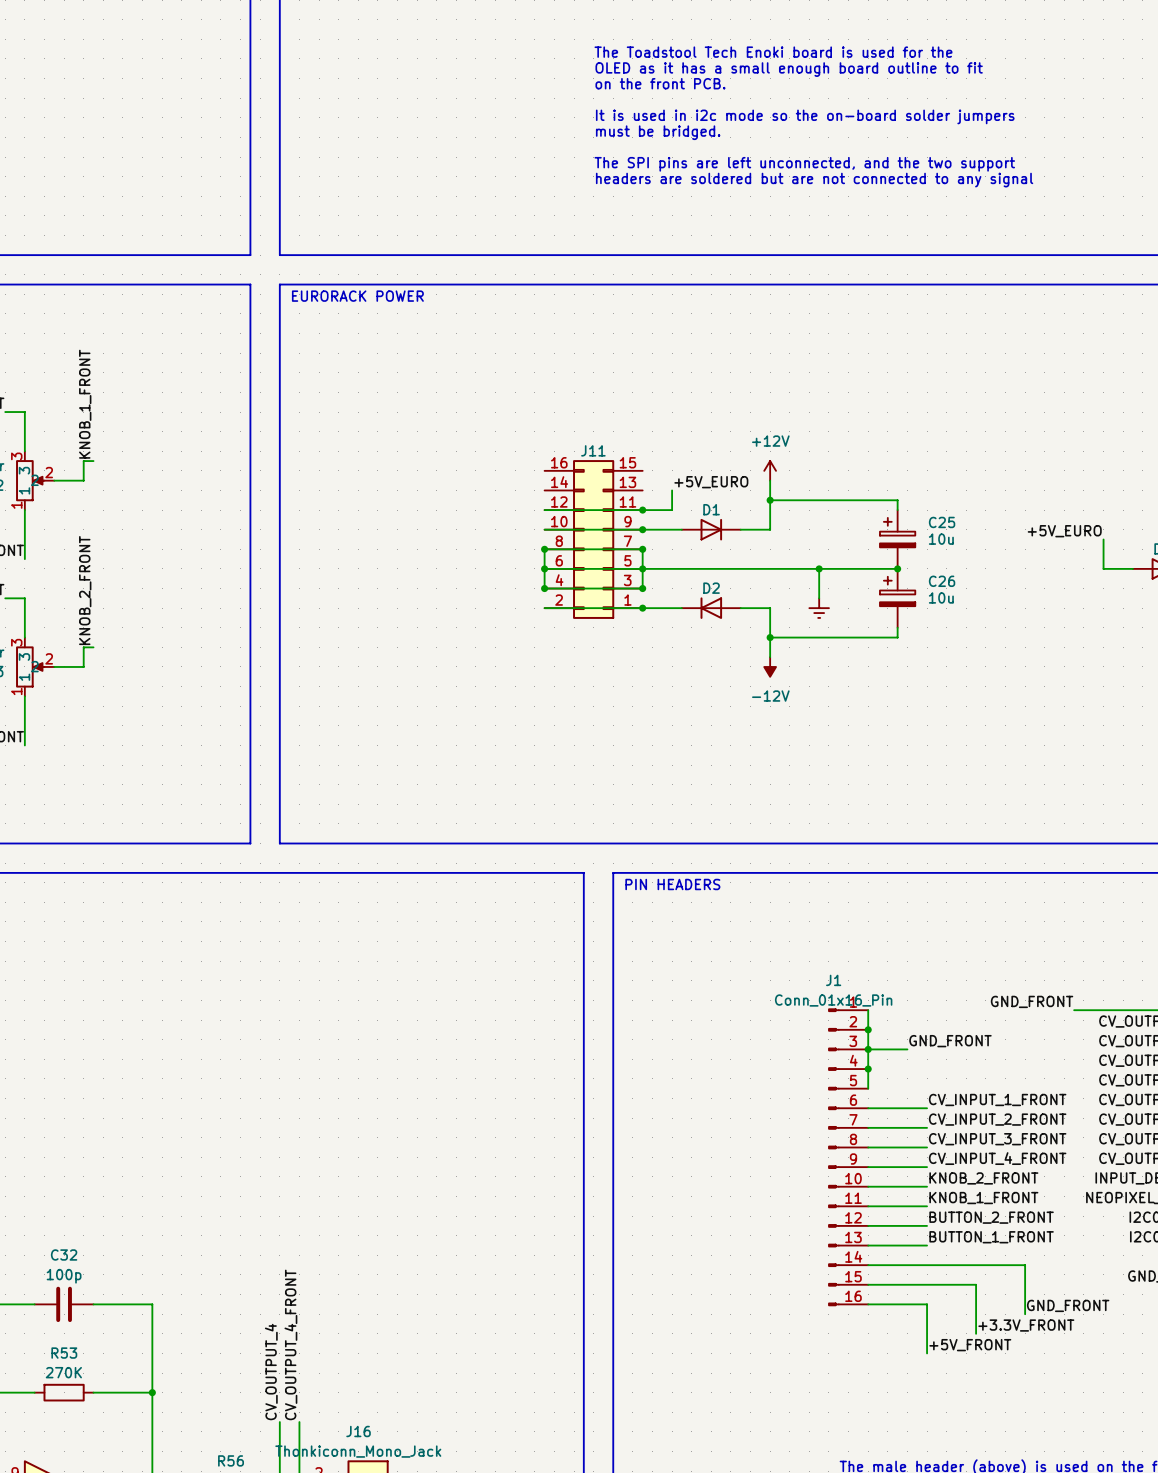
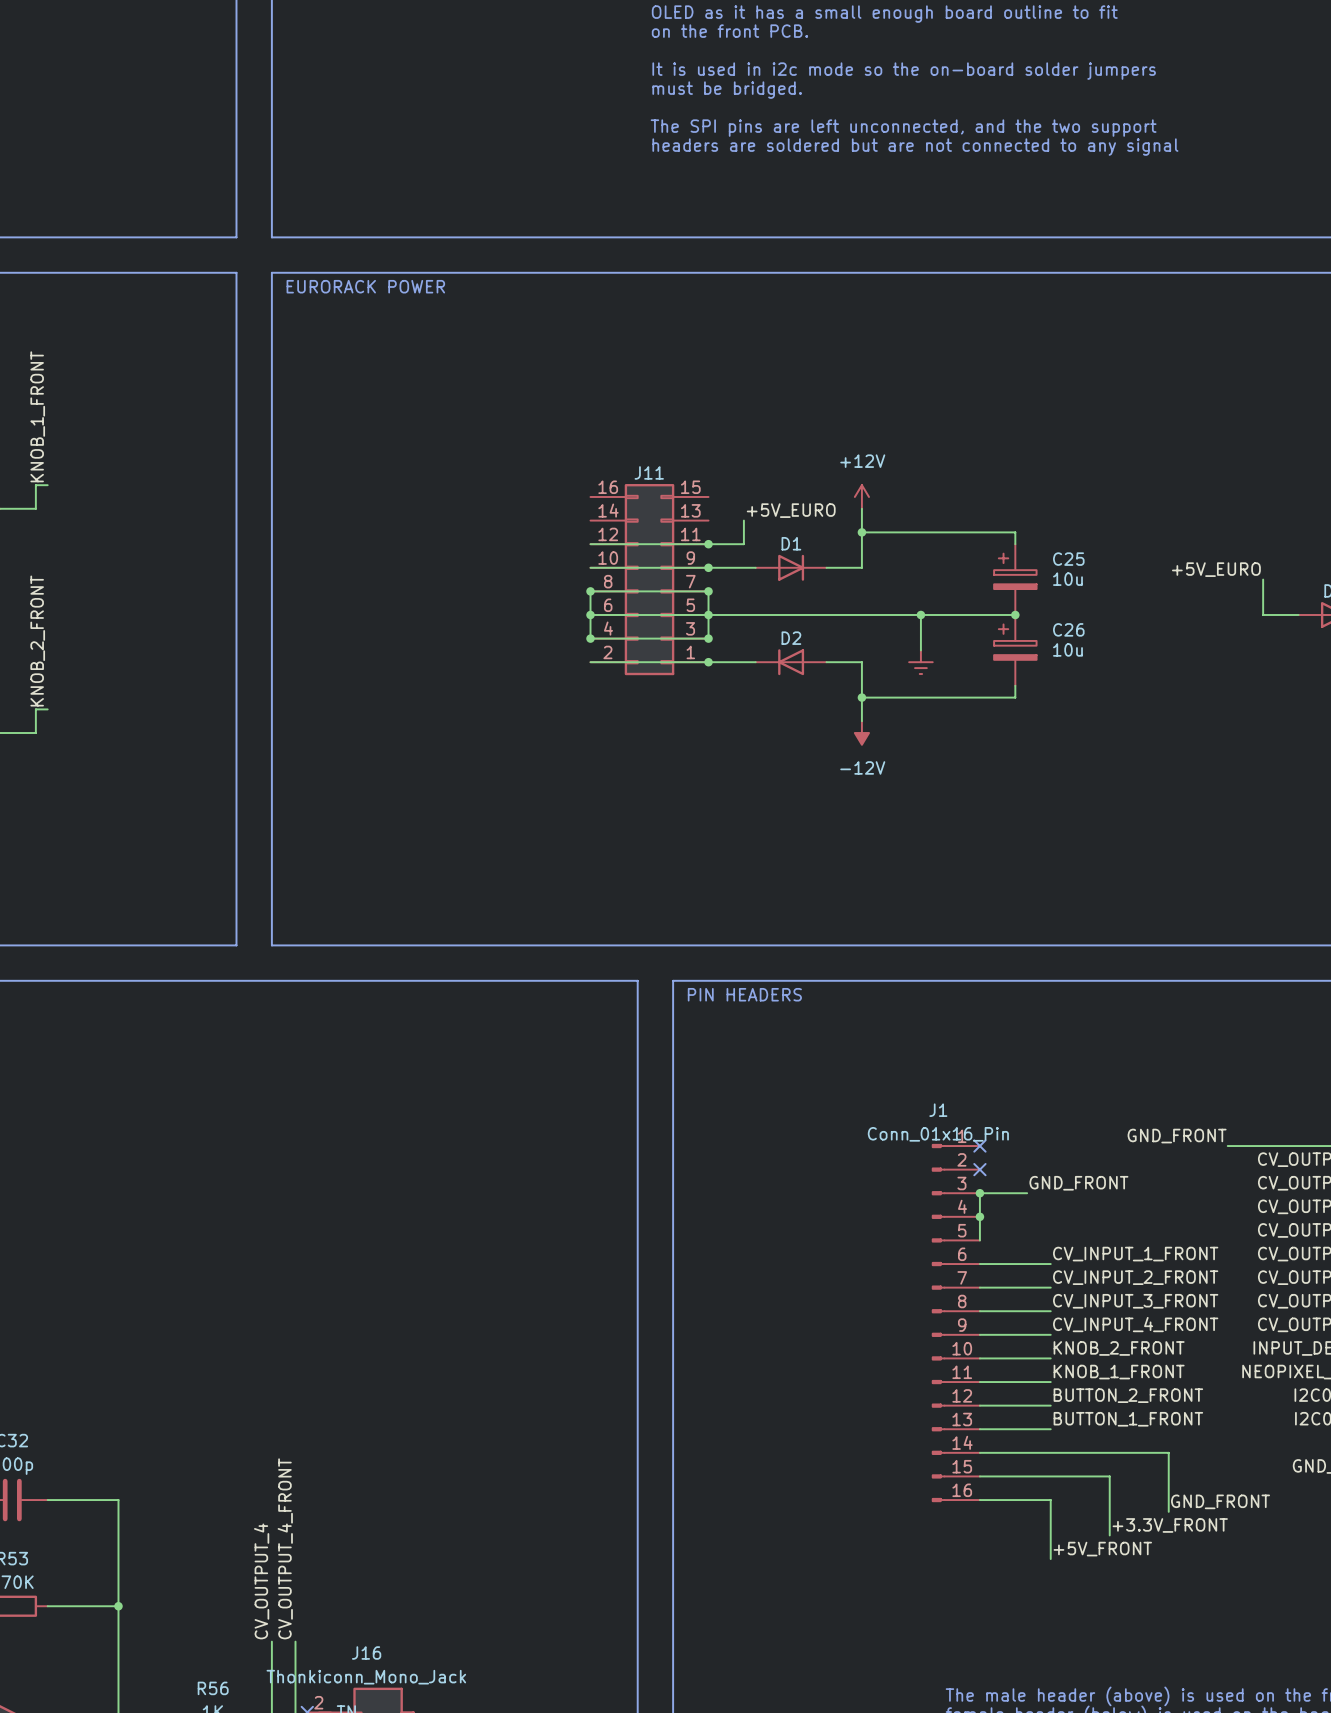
wire: (868, 1010) (868, 1049) -> none
no-connect mark: none -> (979, 1146)
junction: (868, 1029) -> none
no-connect mark: none -> (979, 1169)

